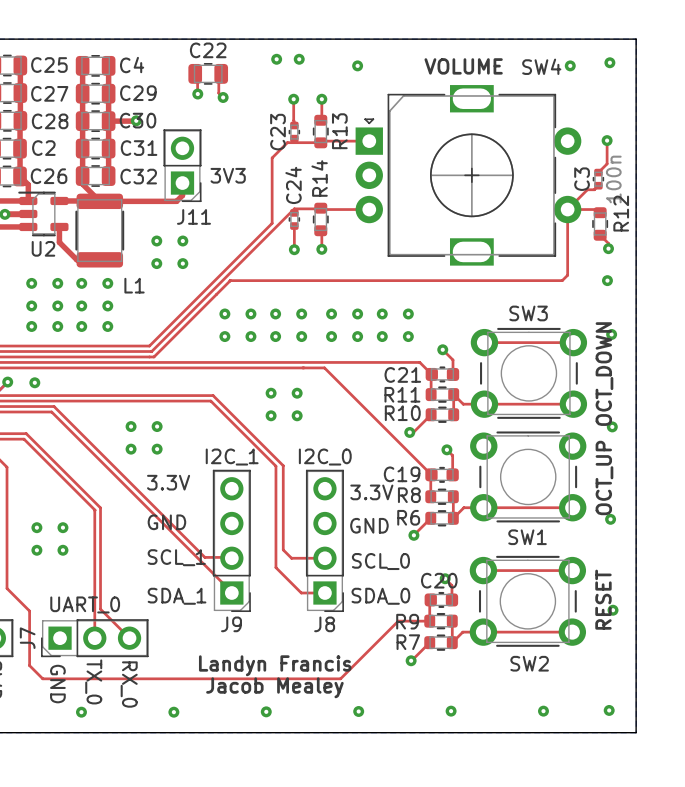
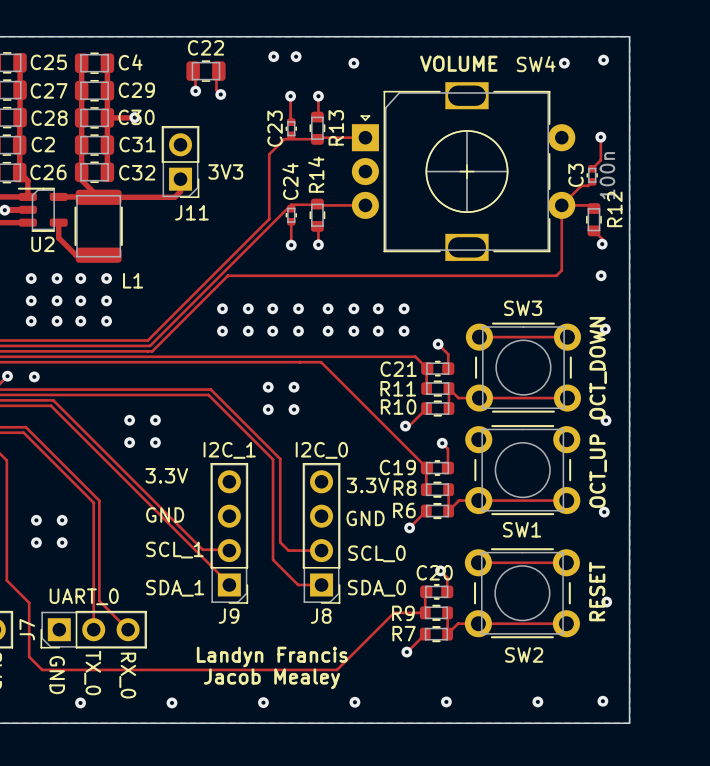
via: (156, 241) -> none
via: (182, 241) -> none
via: (156, 263) -> none
via: (182, 263) -> none

